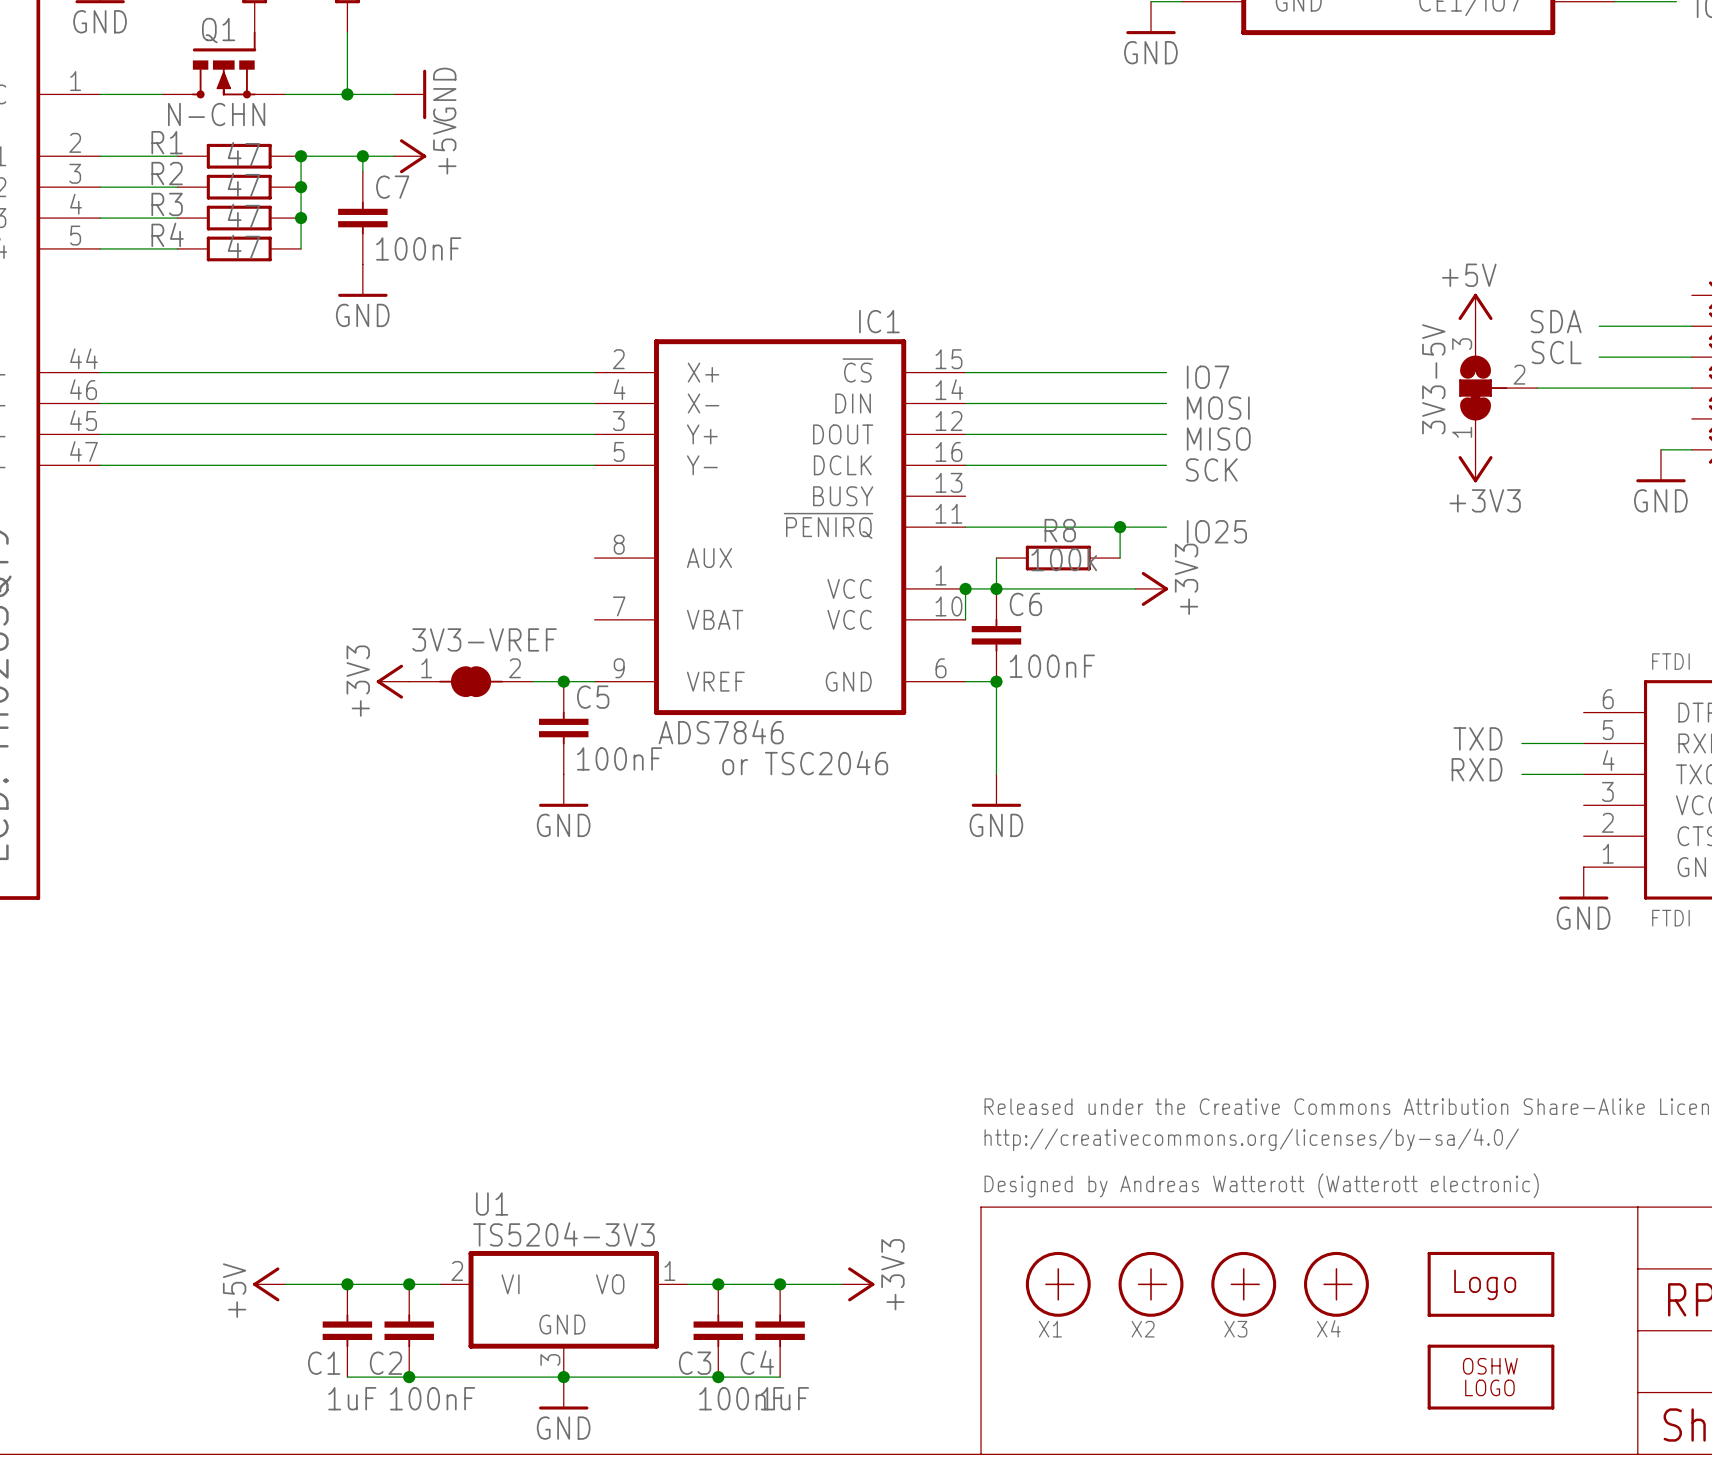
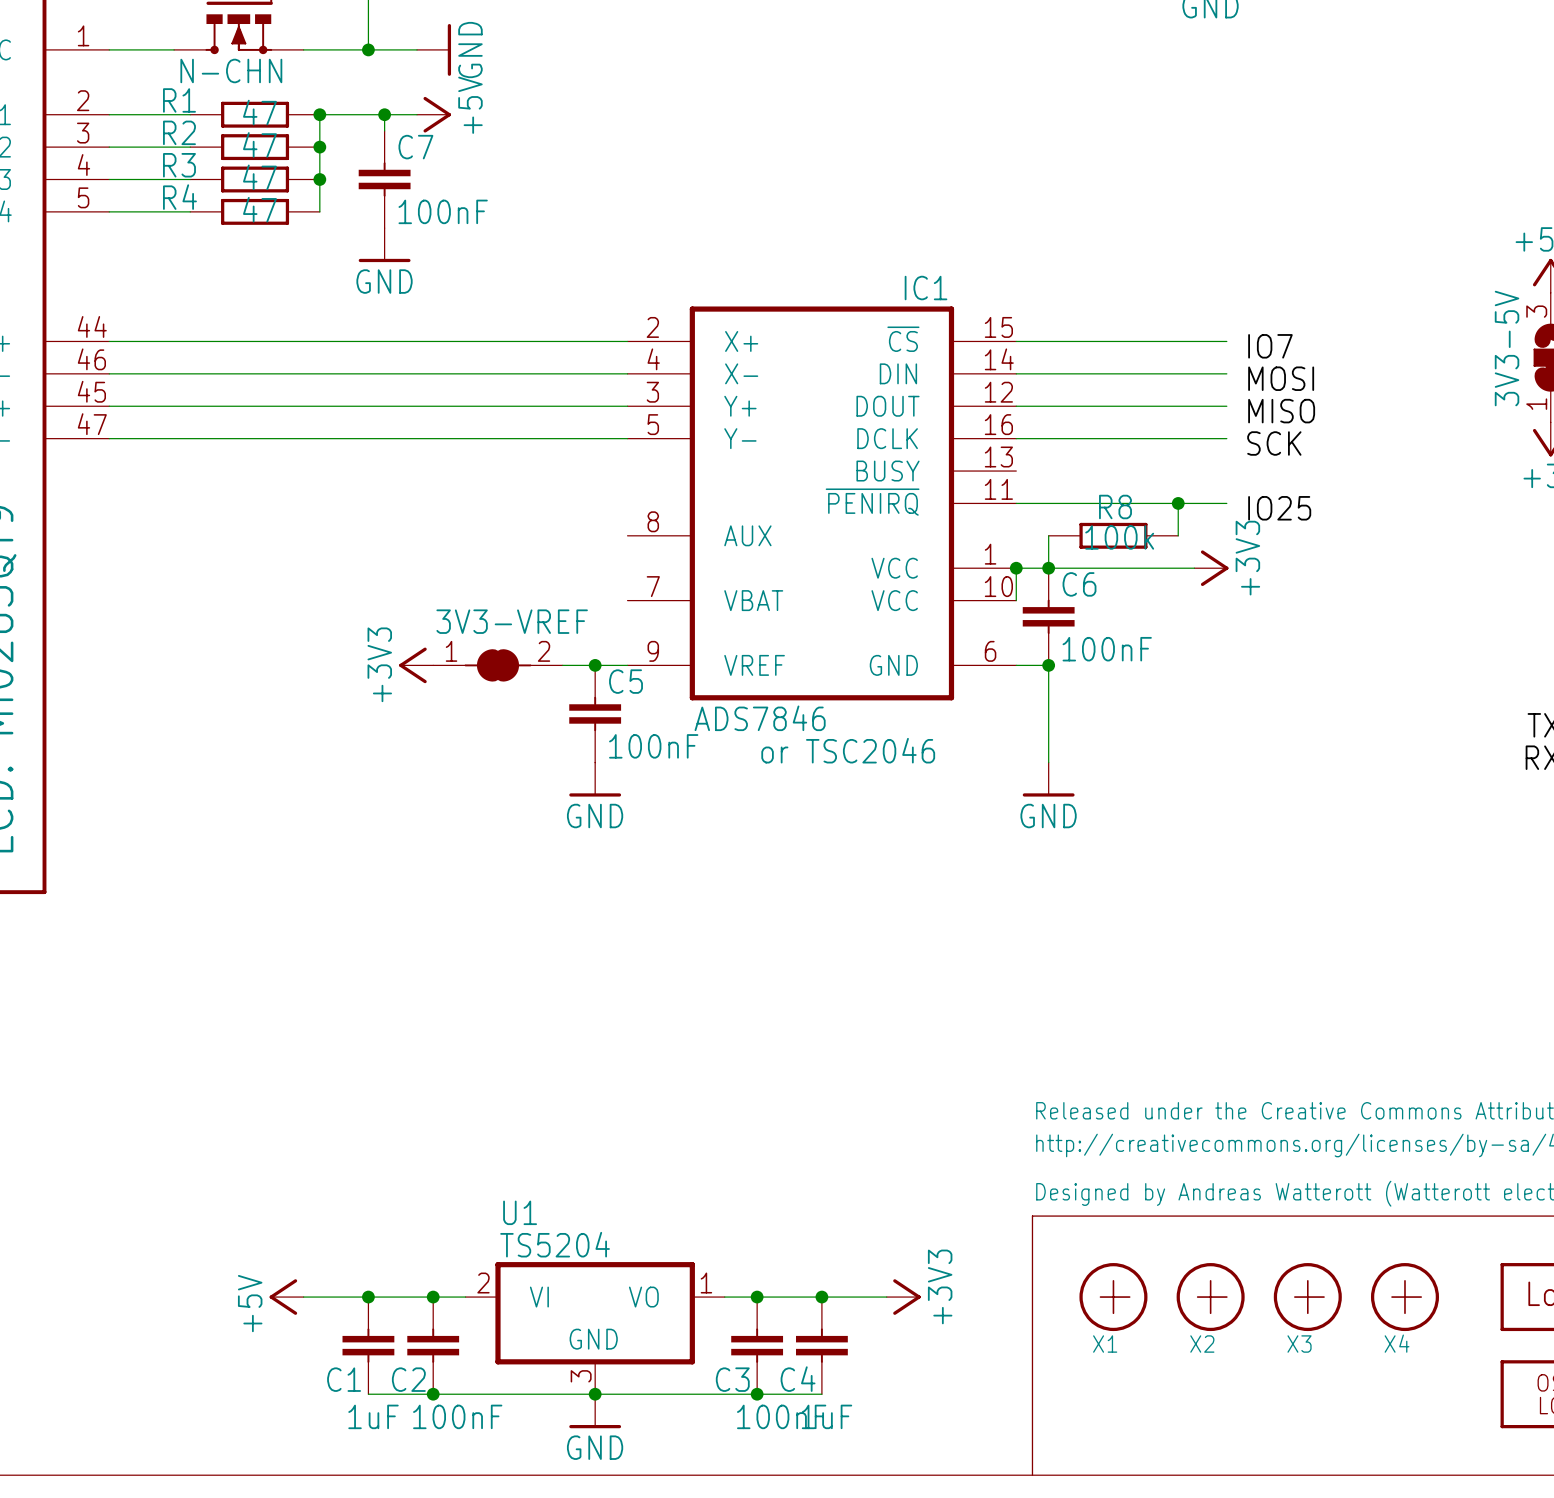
U1 value: TS5204-3V3 (563, 1234) -> TS5204 (555, 1244)

